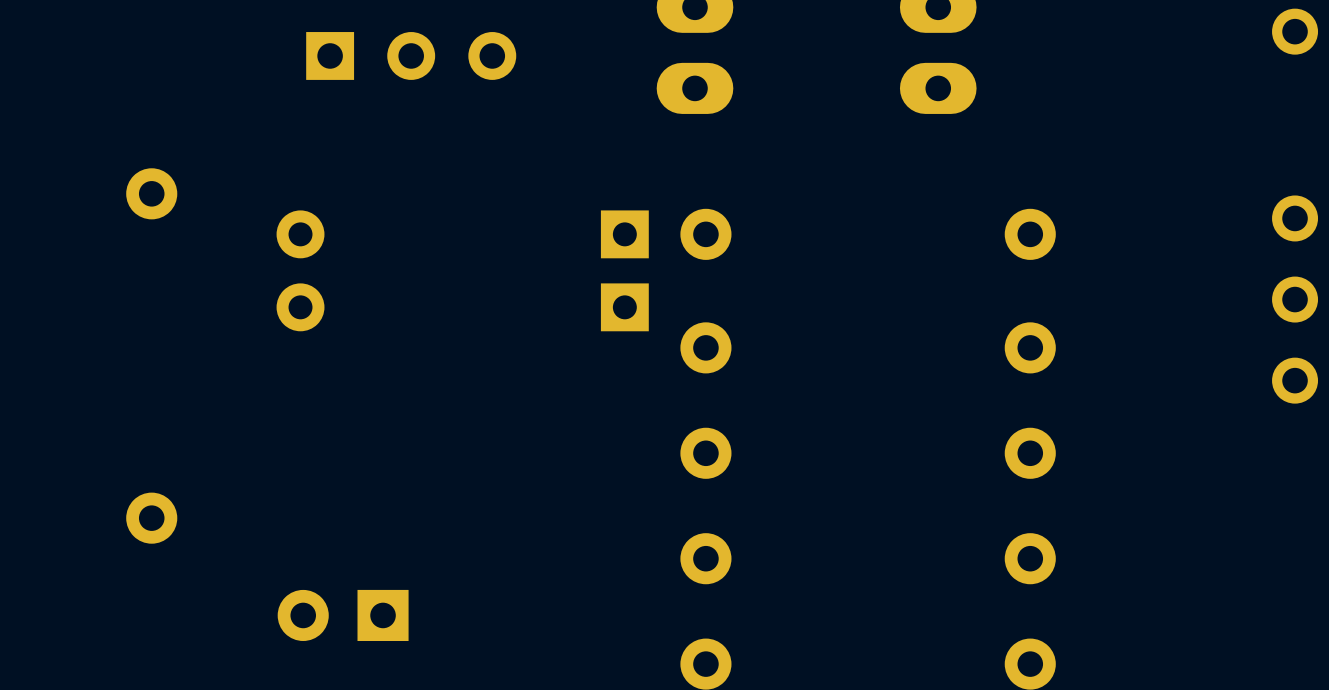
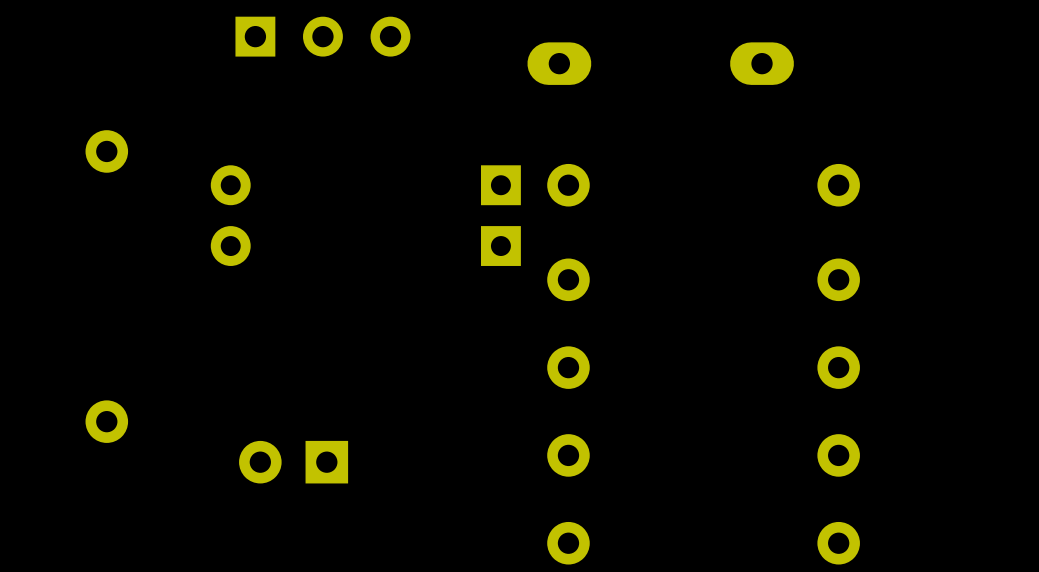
part position: (343, 615) -> (293, 462)

